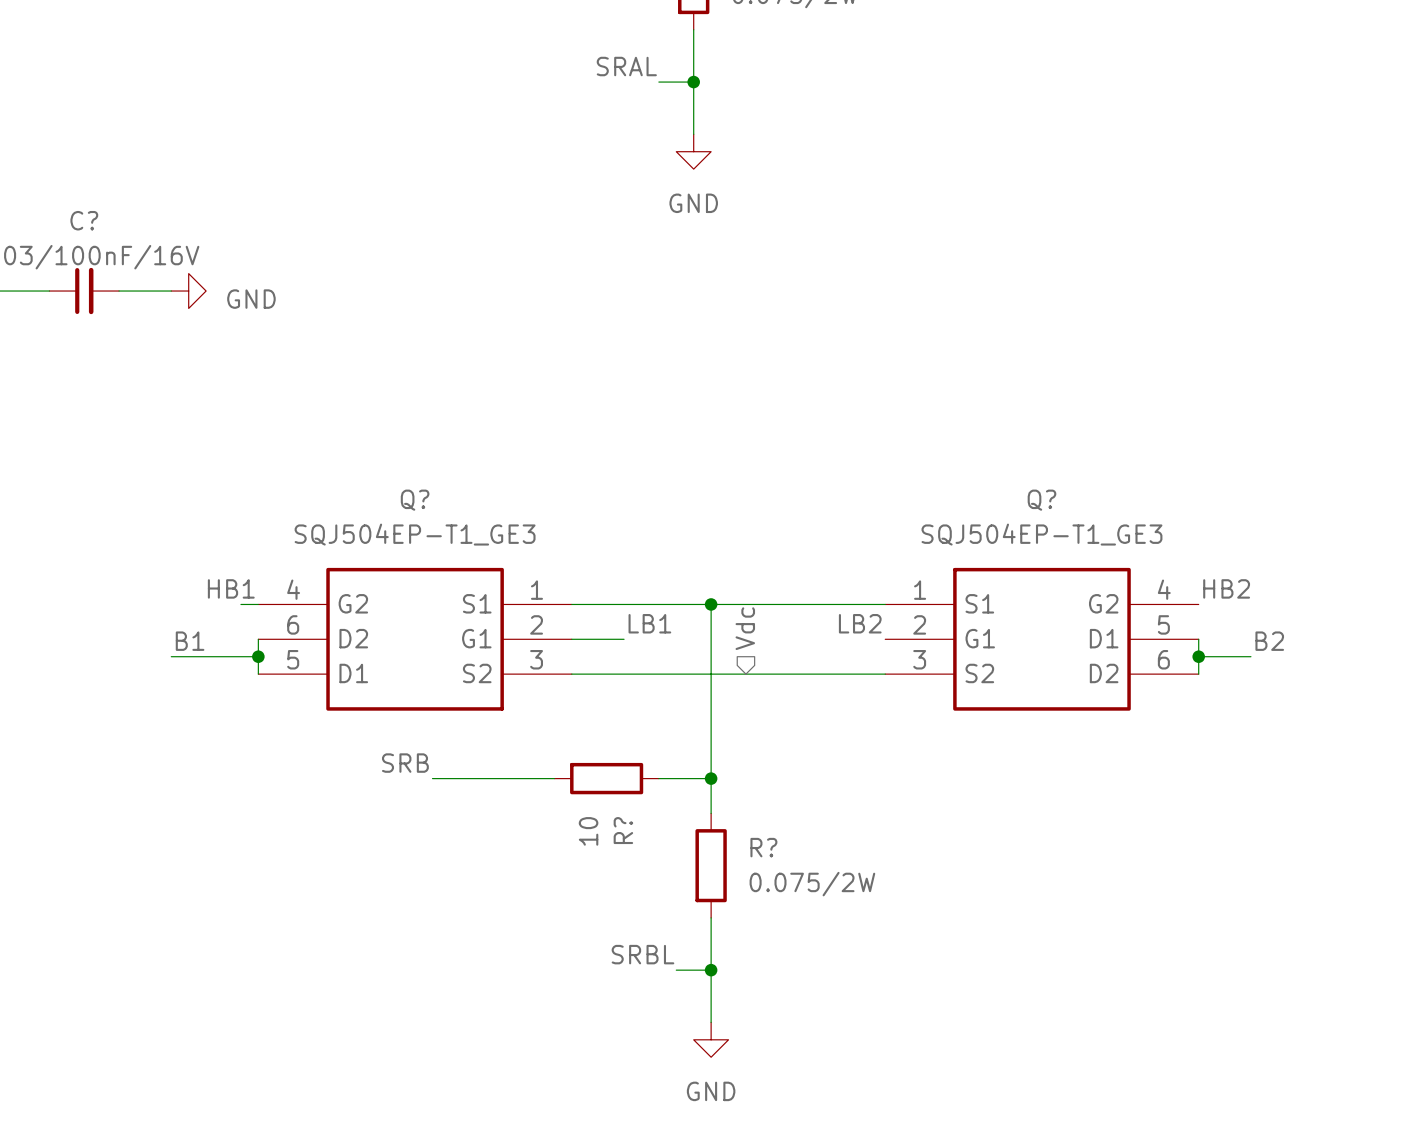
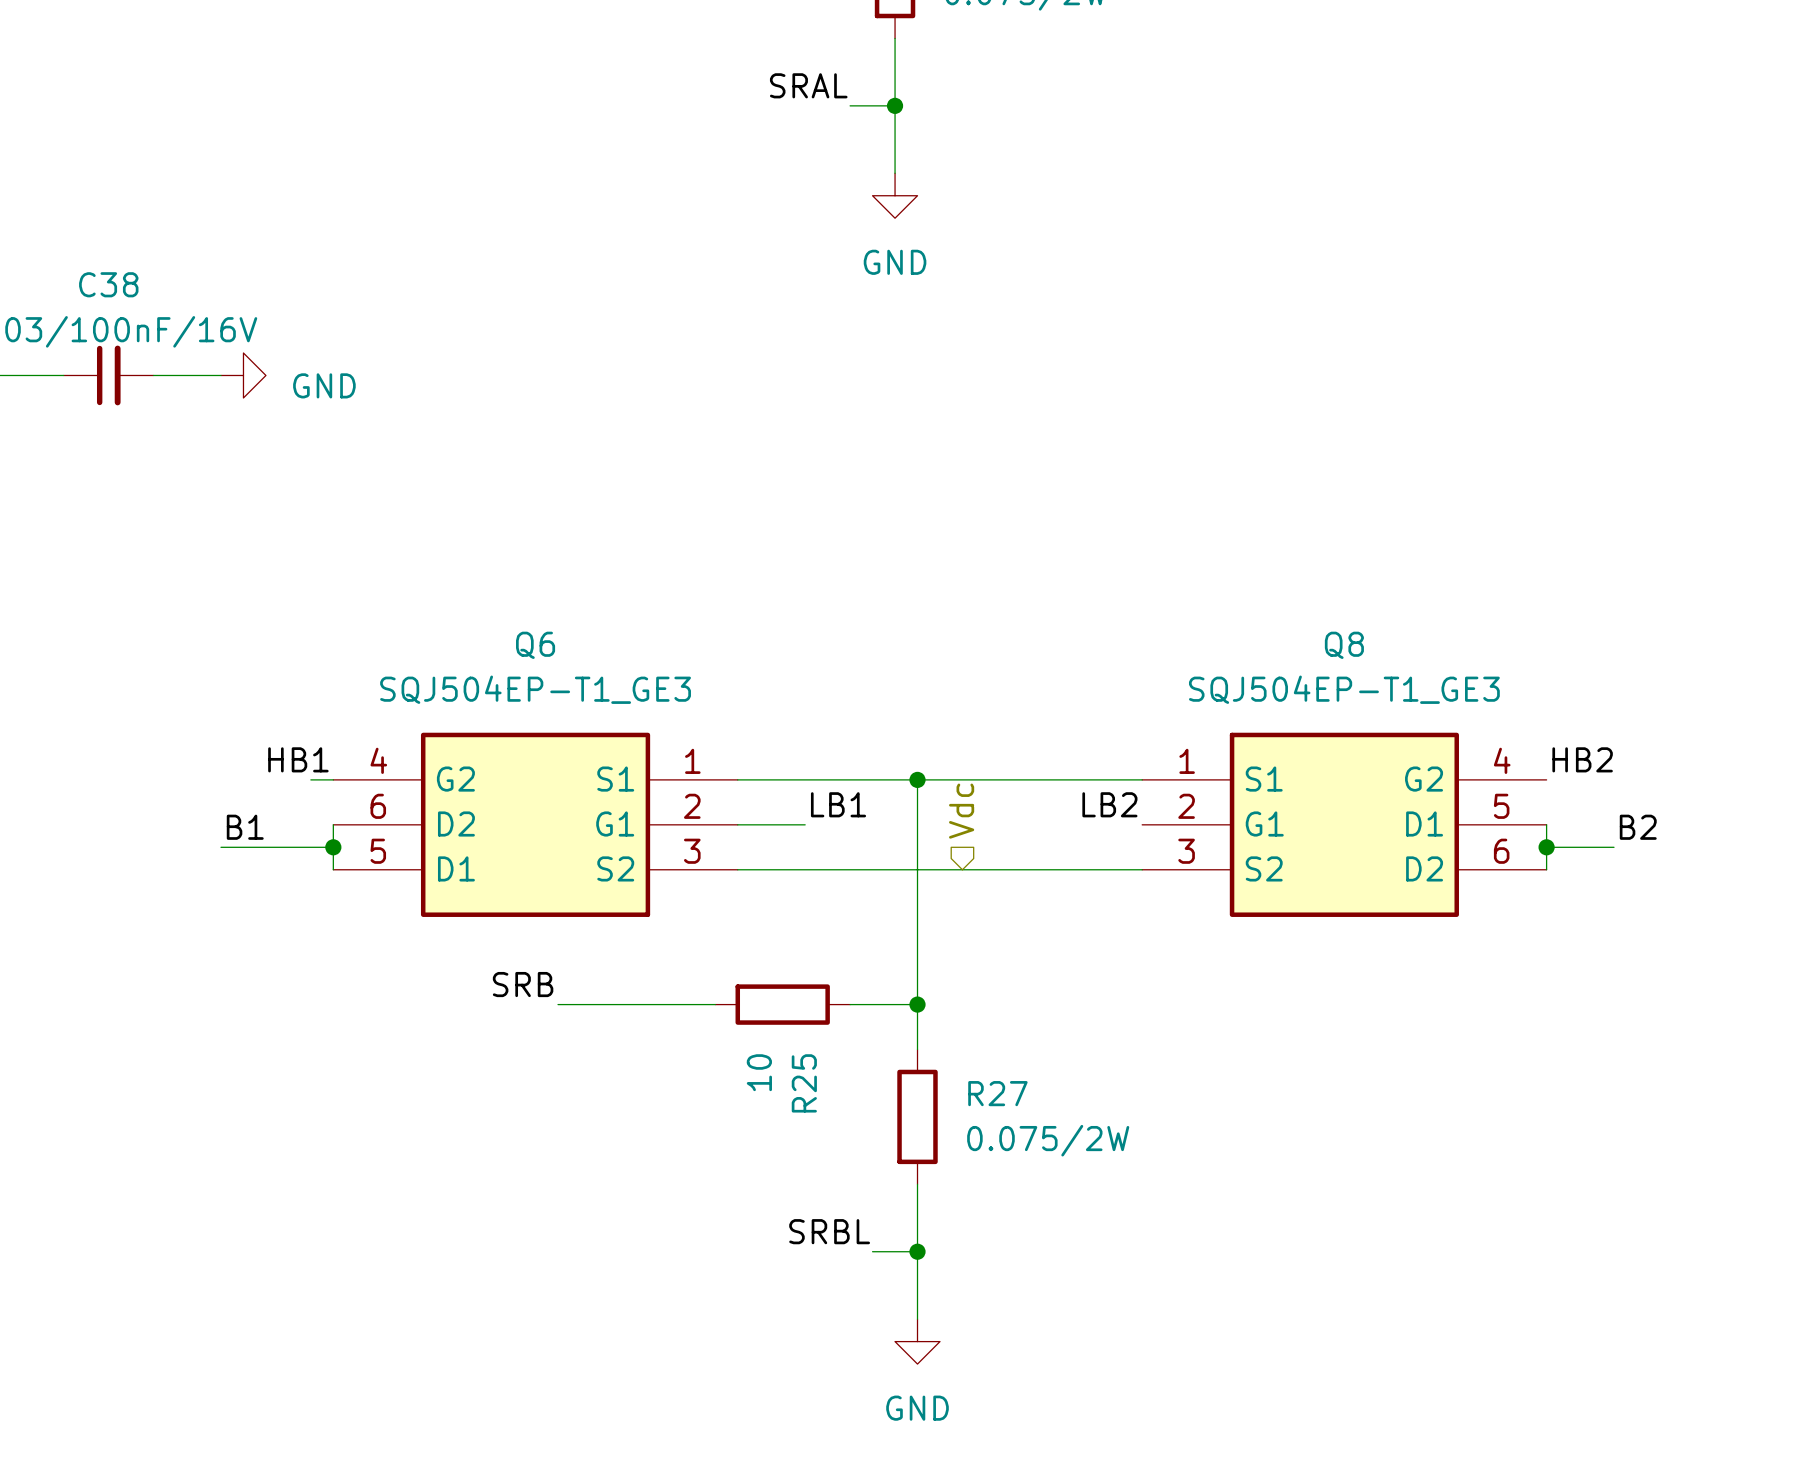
C? name: C? (84, 220) -> C38 (108, 284)
Q? name: Q? (415, 500) -> Q6 (535, 645)
Q? name: Q? (1041, 500) -> Q8 (1344, 645)
R? name: R? (623, 830) -> R25 (804, 1083)
R? name: R? (763, 847) -> R27 (997, 1093)

